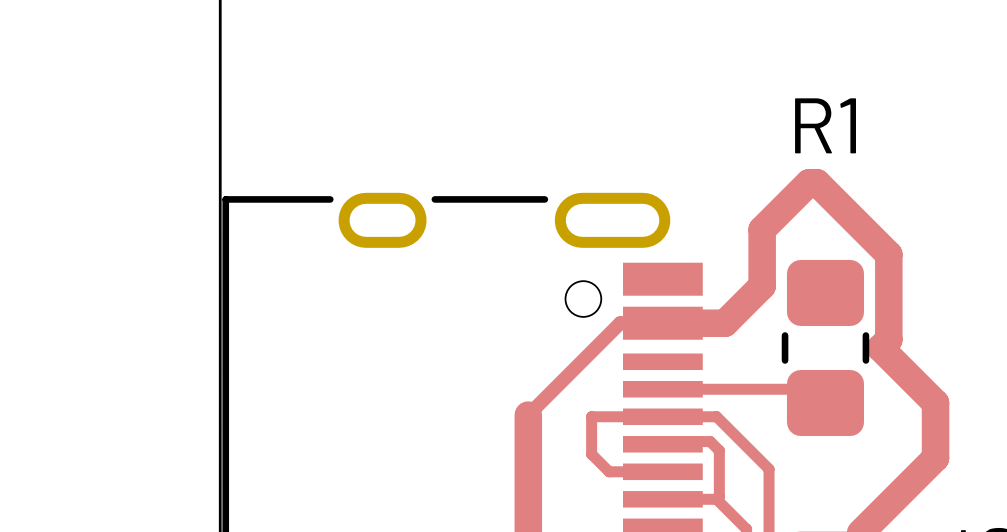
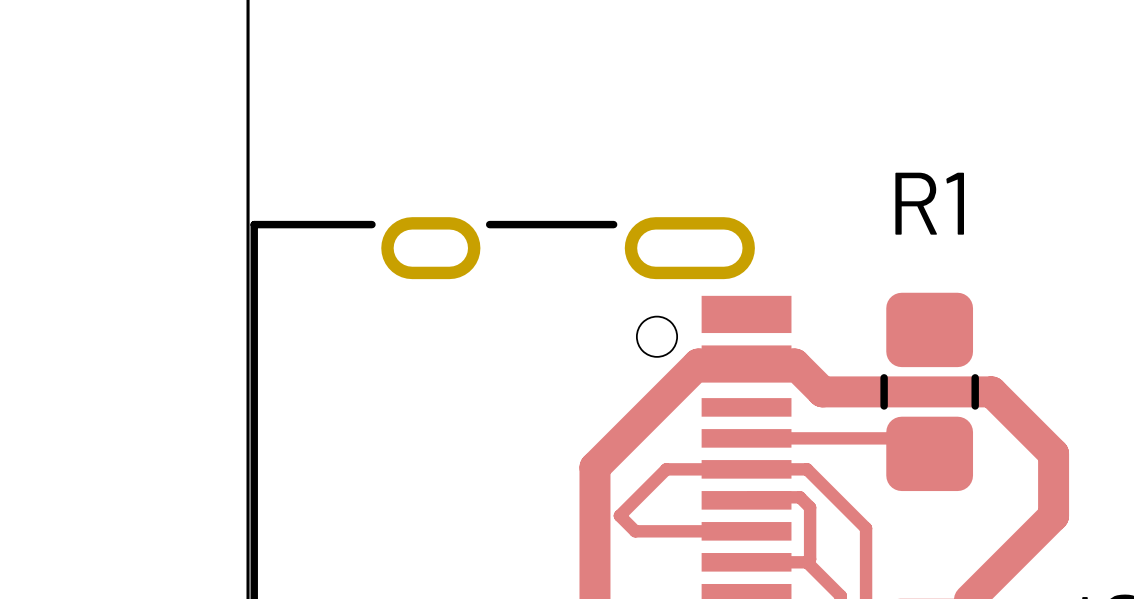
R1 name position: R1 (825, 125) -> R1 (929, 203)
track width: thin (662, 323) (620, 323) (528, 415) -> thick (746, 364) (698, 364) (594, 467)
track: (705, 323) (724, 323) (762, 285) (762, 229) (808, 182) (817, 182) (888, 254) (888, 339) (880, 347) -> (794, 364) (822, 391) (991, 391)
track: (591, 416) (591, 454) (609, 471) -> (666, 469) (619, 515) (635, 531) (686, 531)

